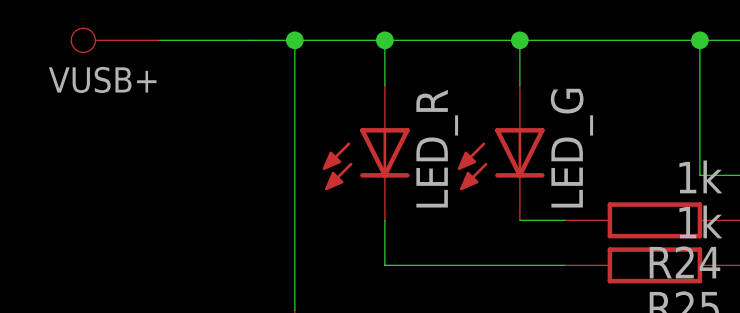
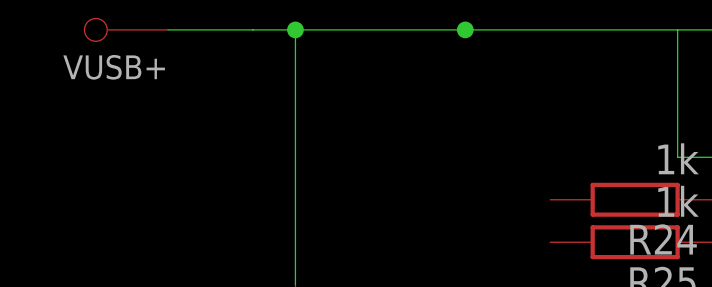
wire: (384, 40) (384, 85) -> none
junction: (384, 40) -> none
junction: none -> (465, 29)
wire: (519, 40) (519, 85) -> none
junction: (519, 40) -> none
junction: (699, 40) -> none
LED_R: (366, 152) -> none
LED_G: (501, 152) -> none
wire: (384, 220) (384, 265) (564, 265) -> none
wire: (519, 220) (564, 220) -> none

